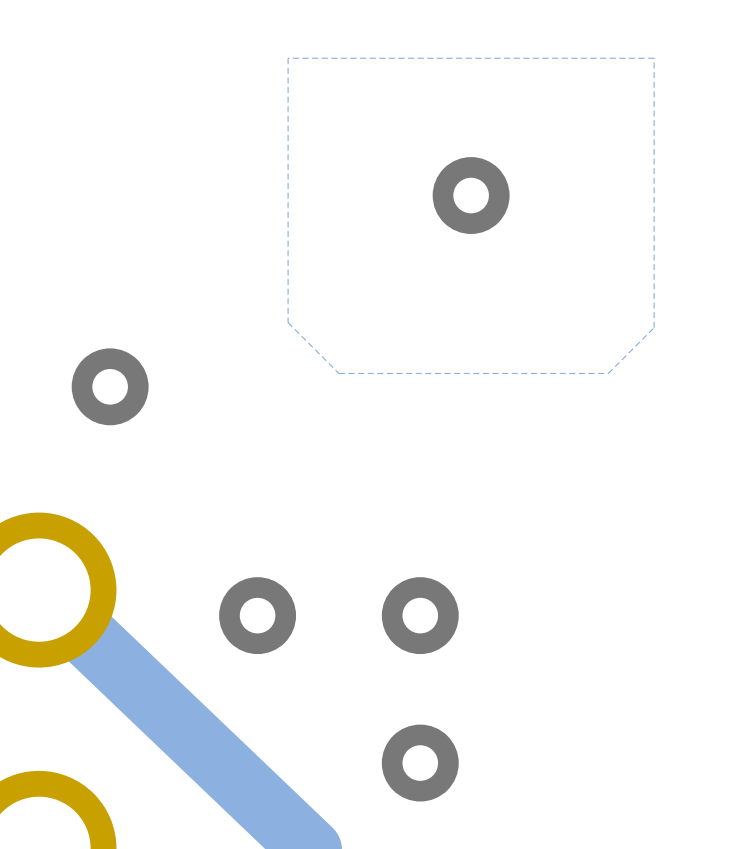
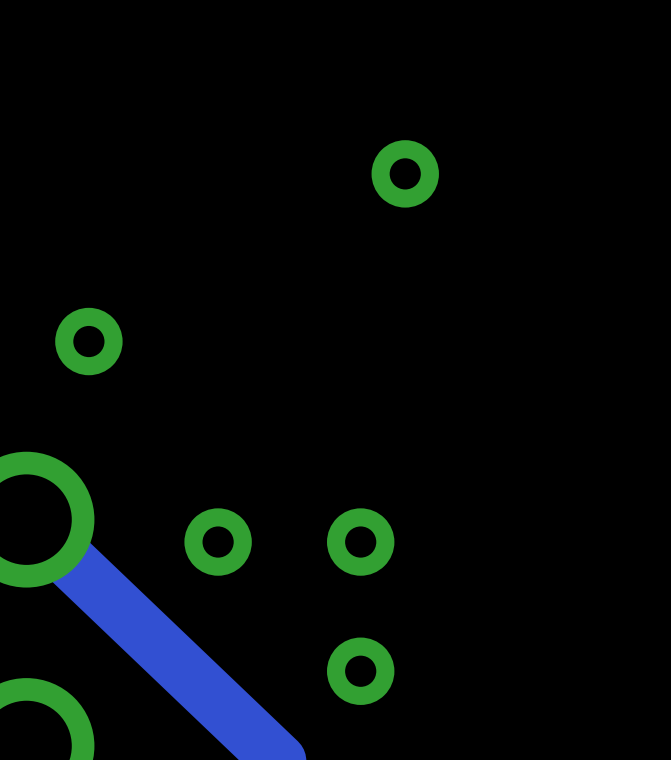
zone outline: (654, 58) (654, 327) (608, 373) (338, 373) (288, 322) (288, 58) (654, 58) -> none

